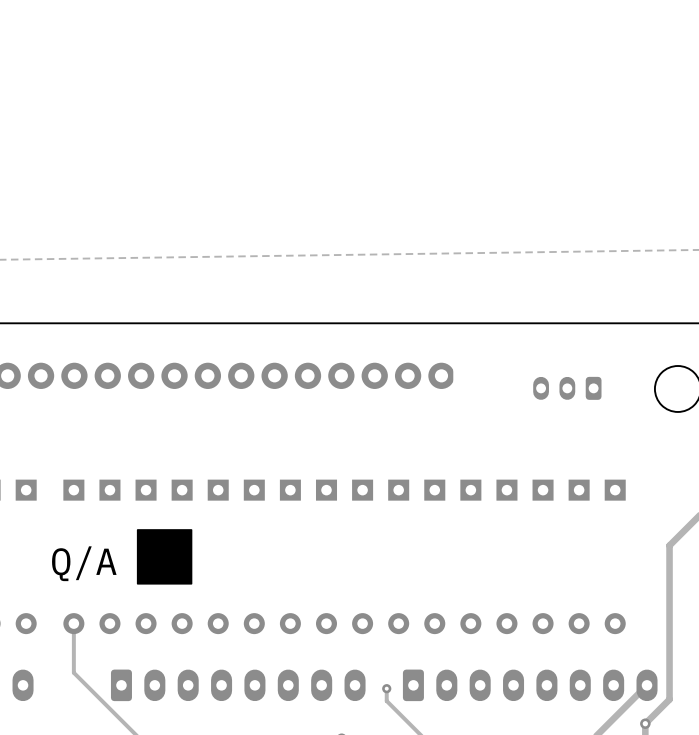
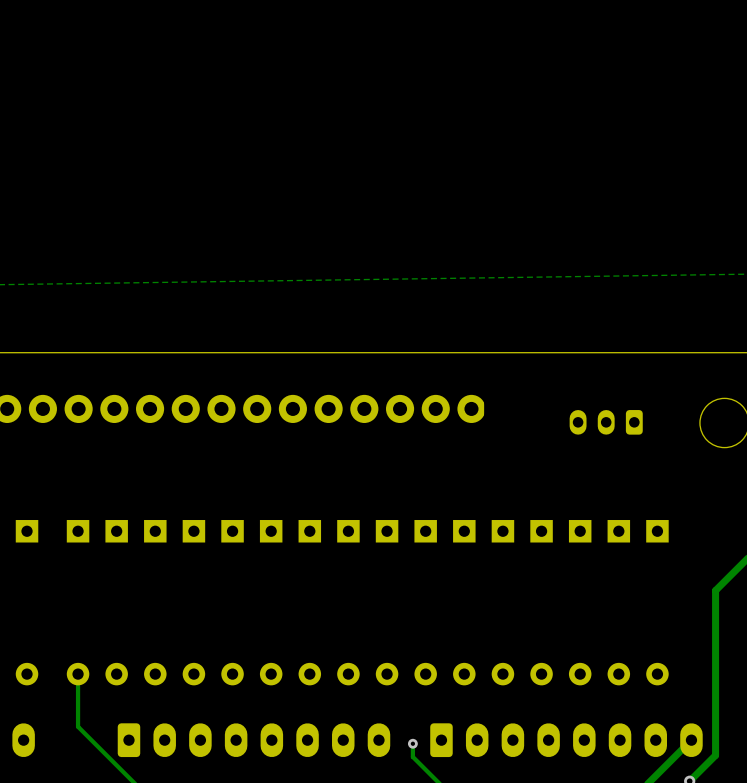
drawing: [136, 529, 193, 585] -> none
text: Q/A (84, 563) -> none

